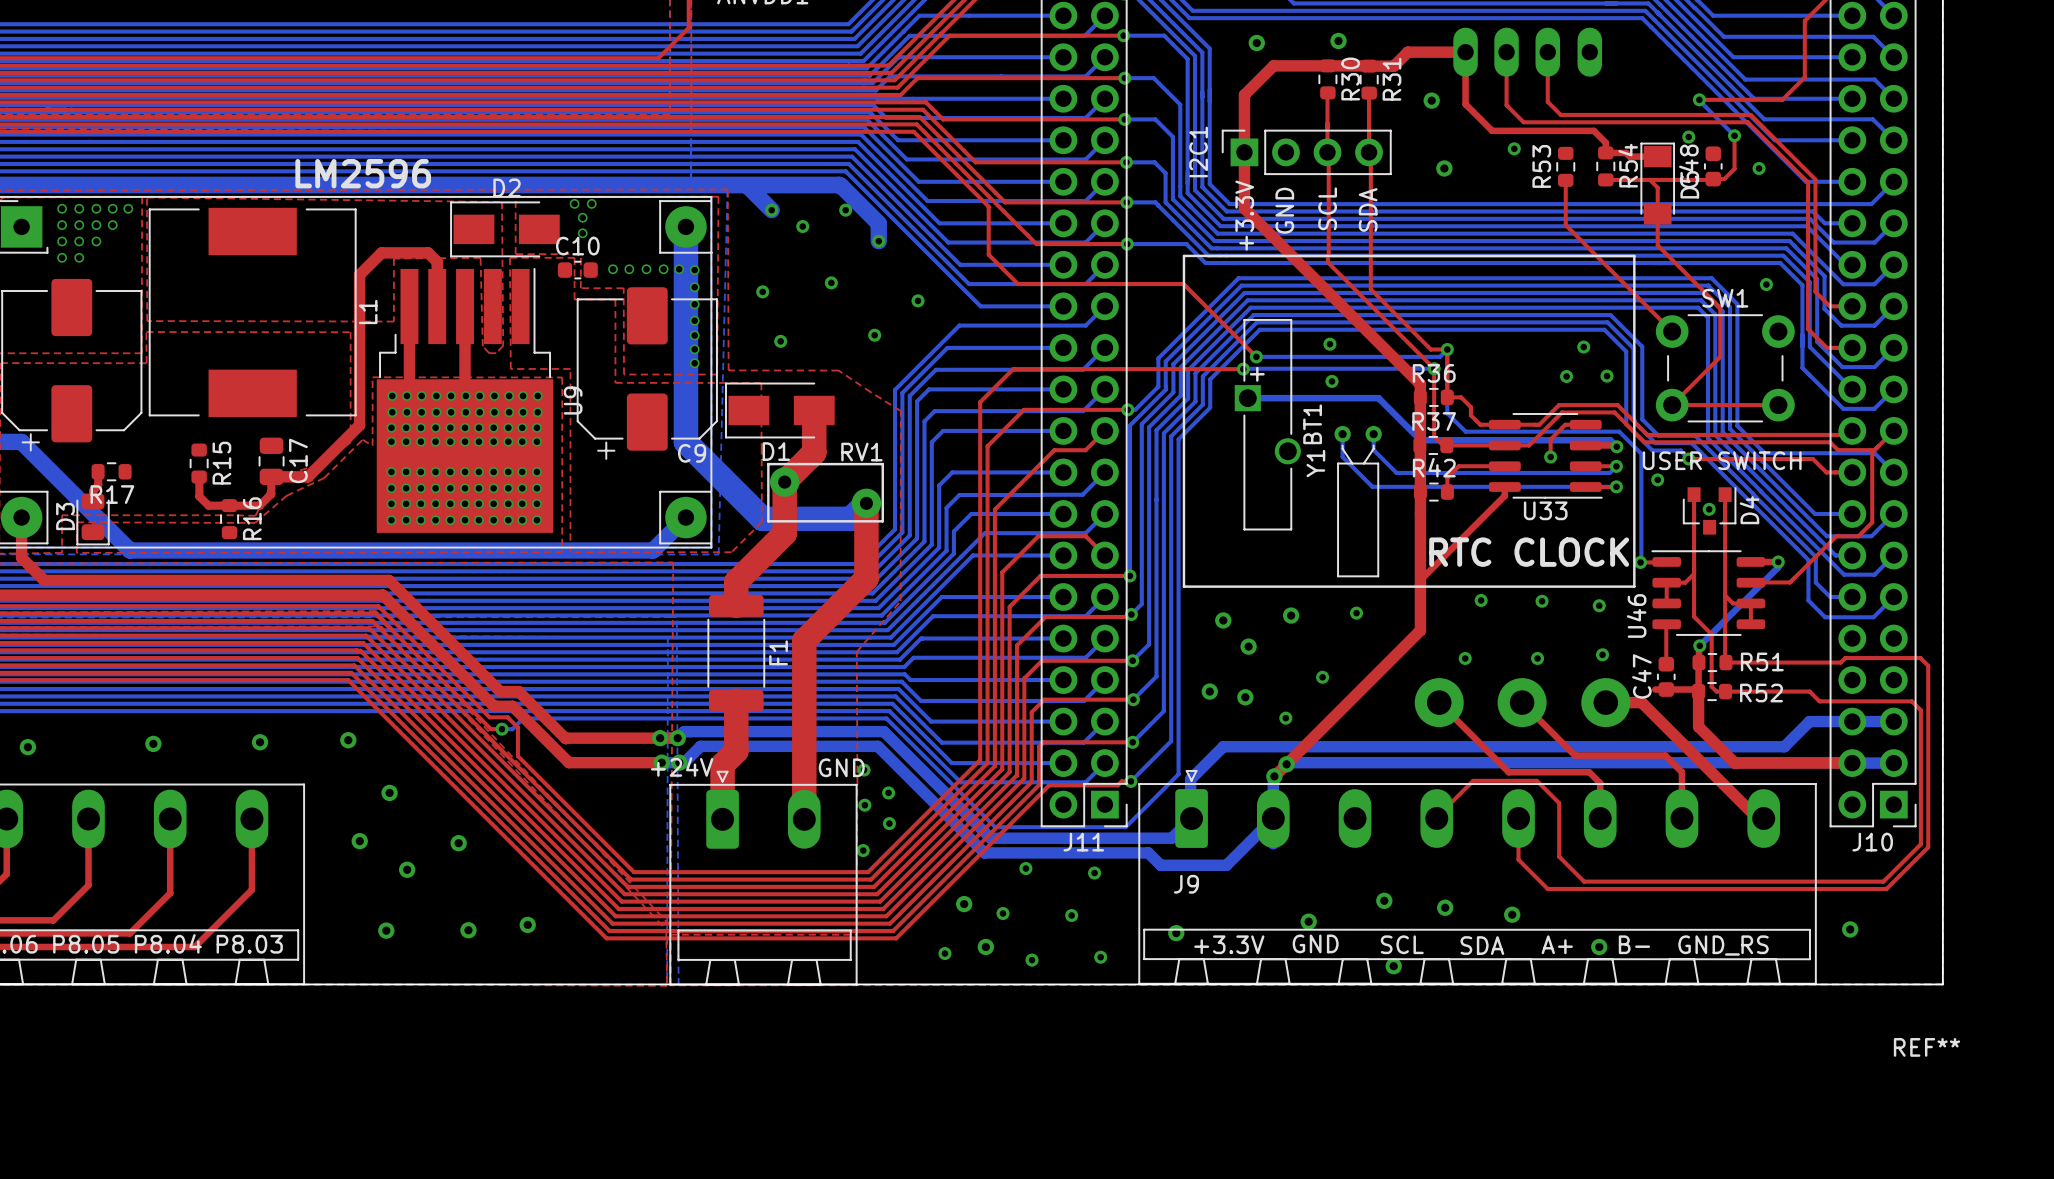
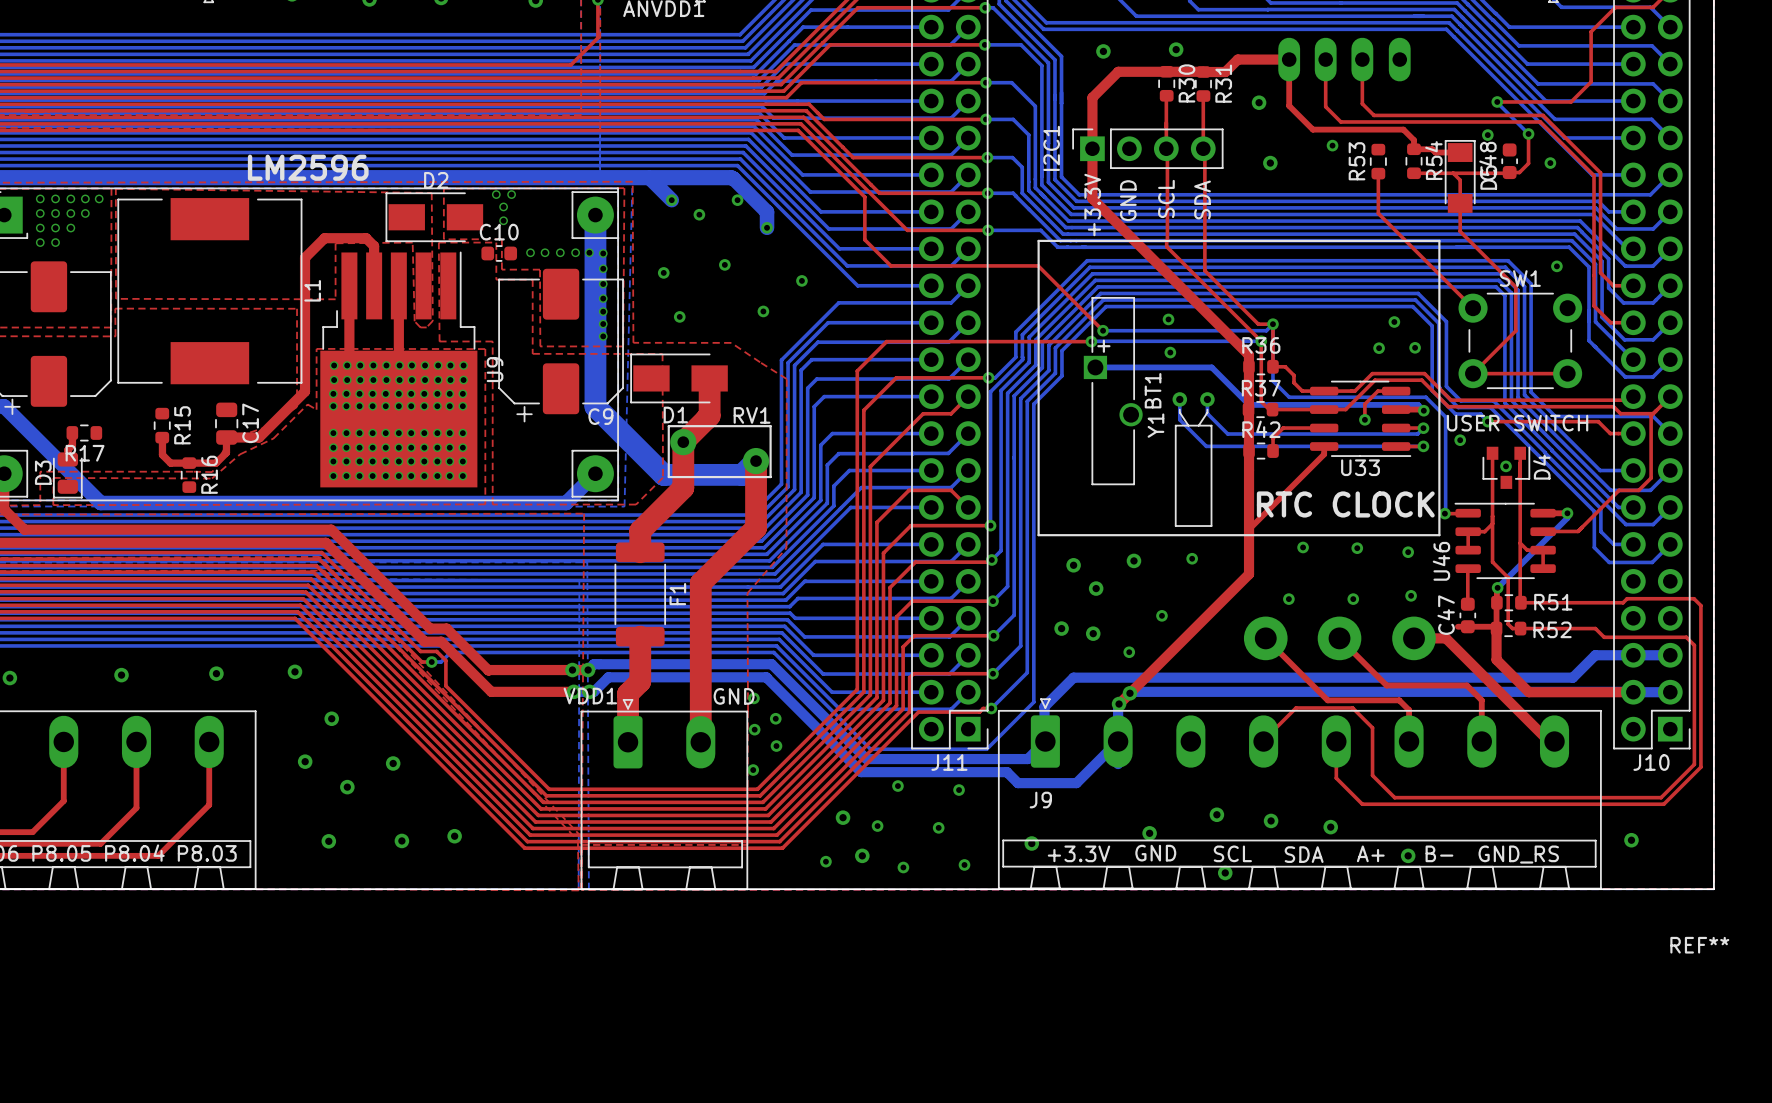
+24V name: +24V (682, 767) -> VDD1 (590, 696)

